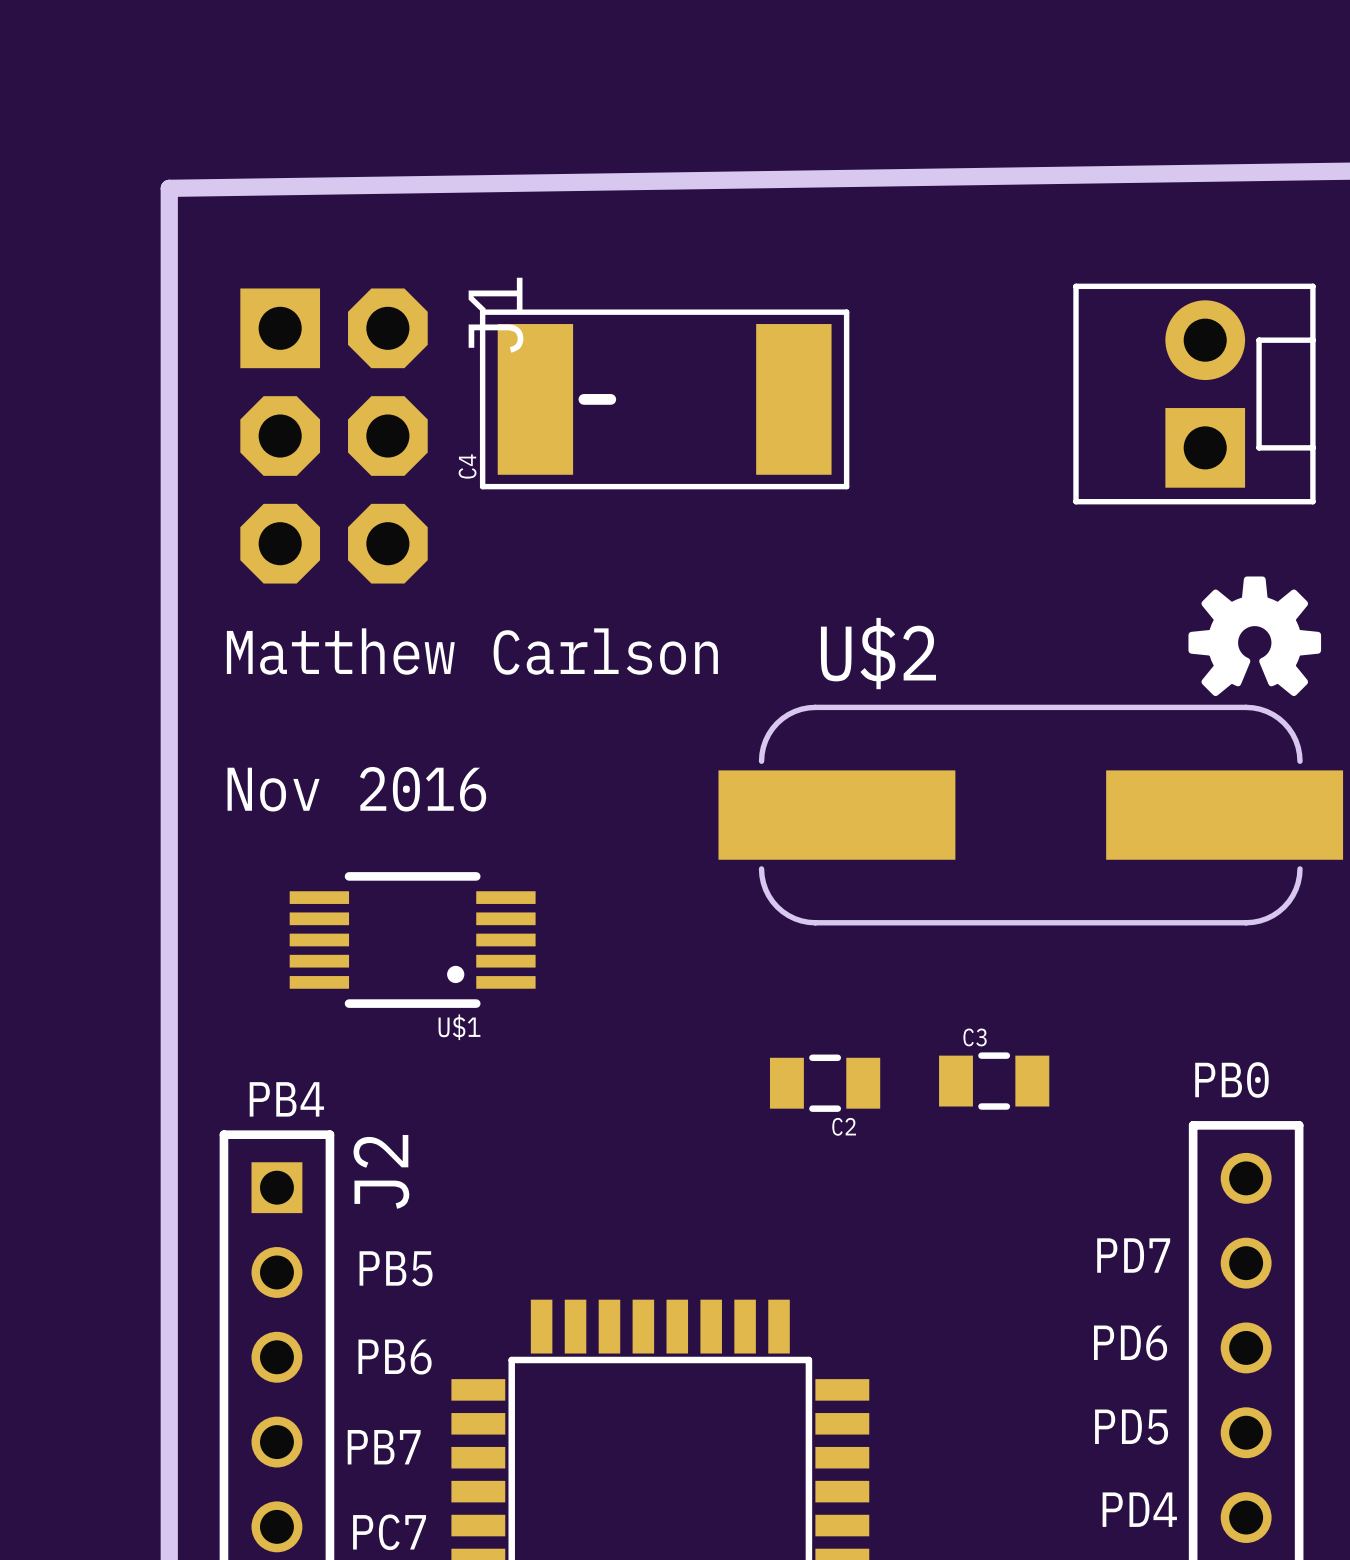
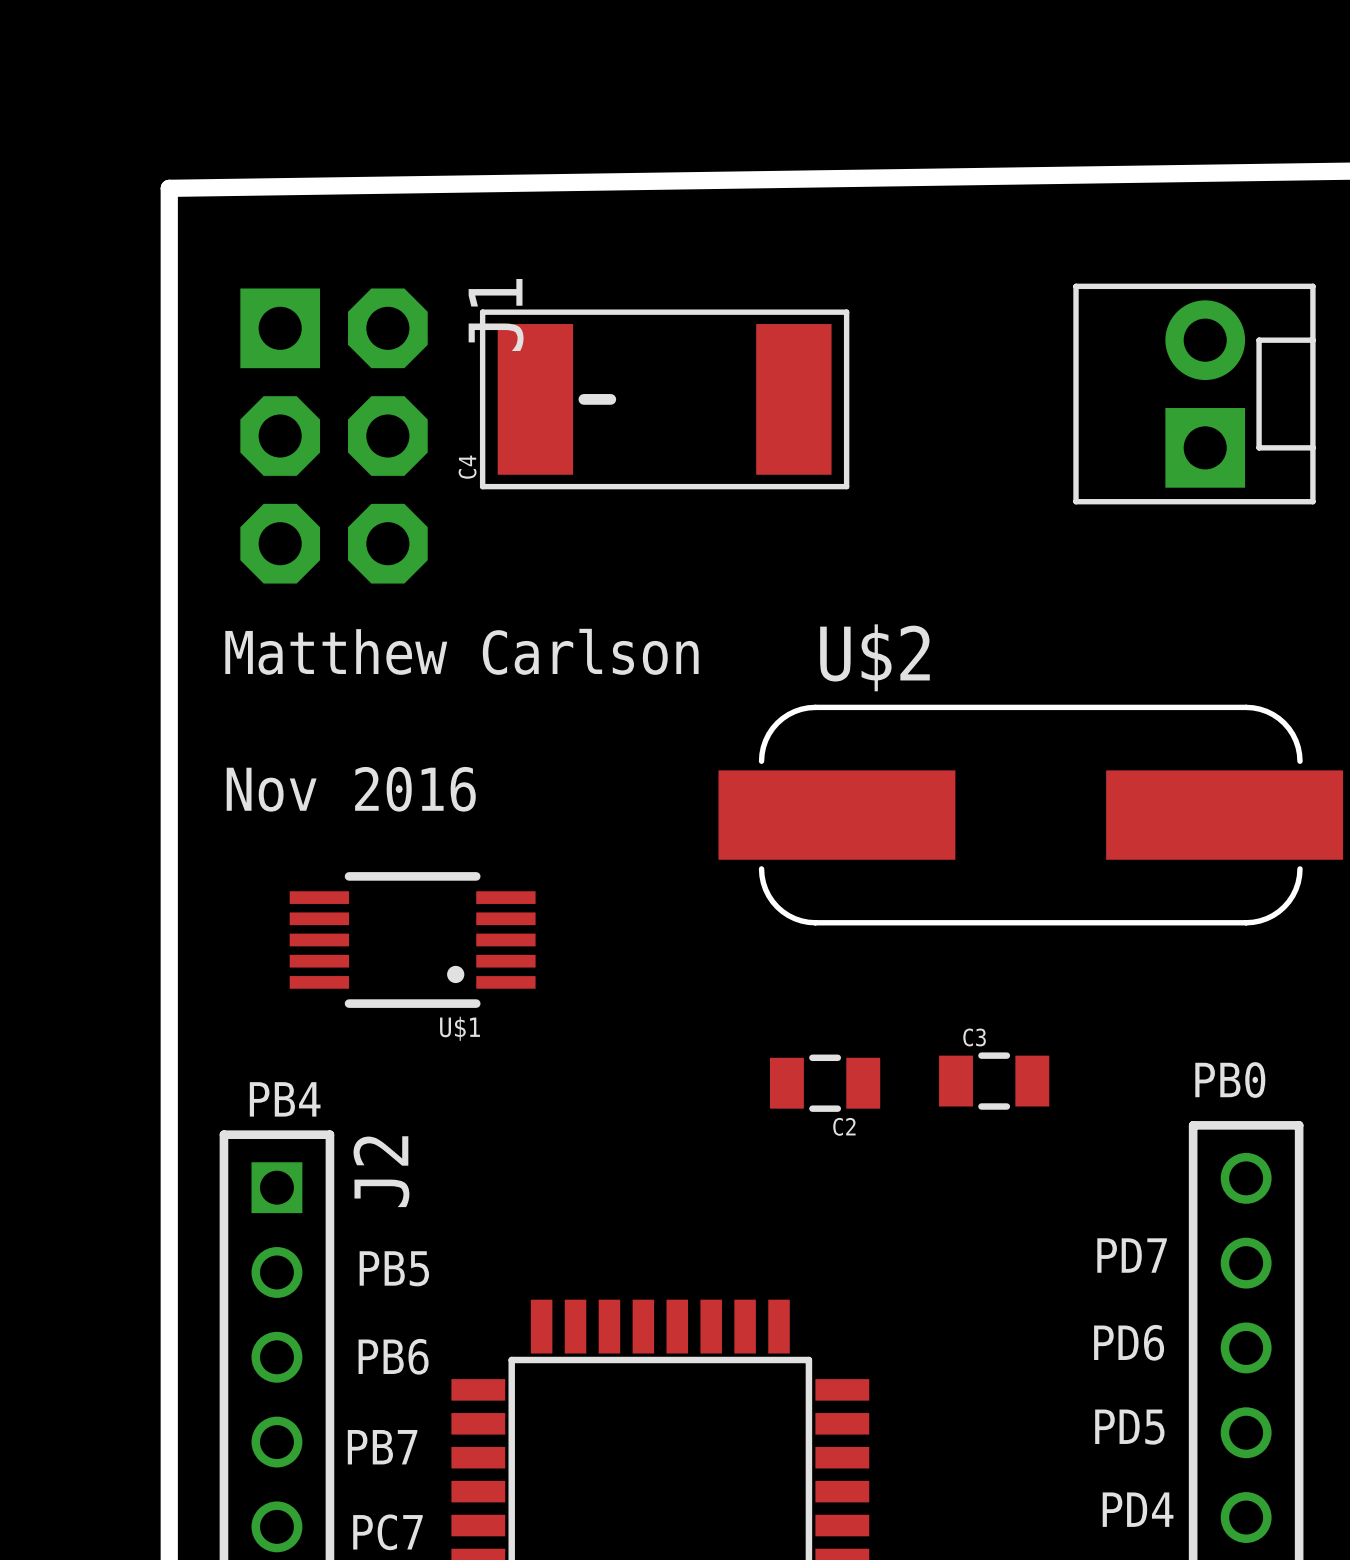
drawing: [1188, 576, 1322, 697] -> none

